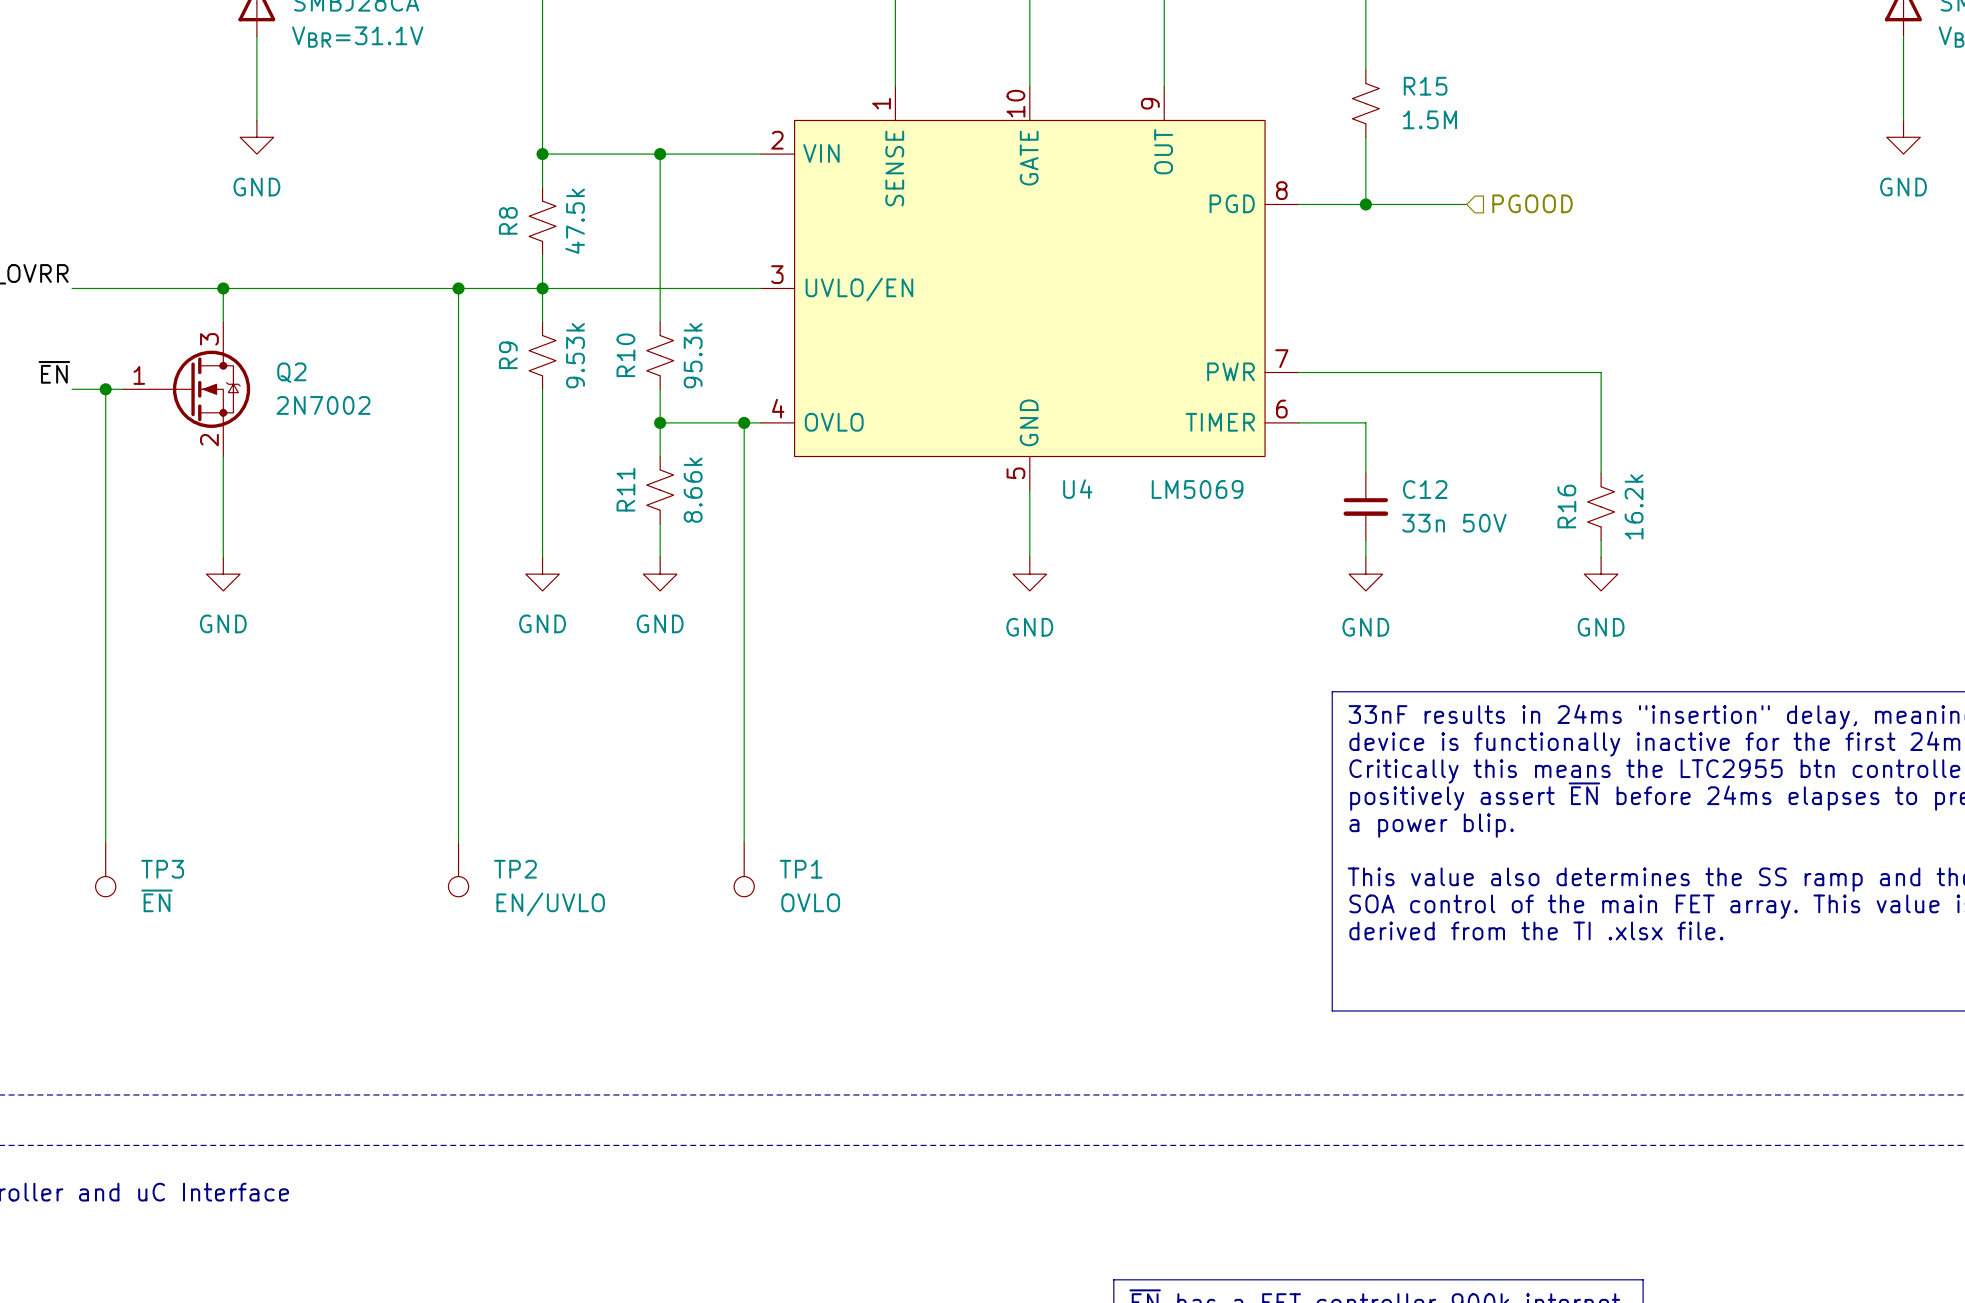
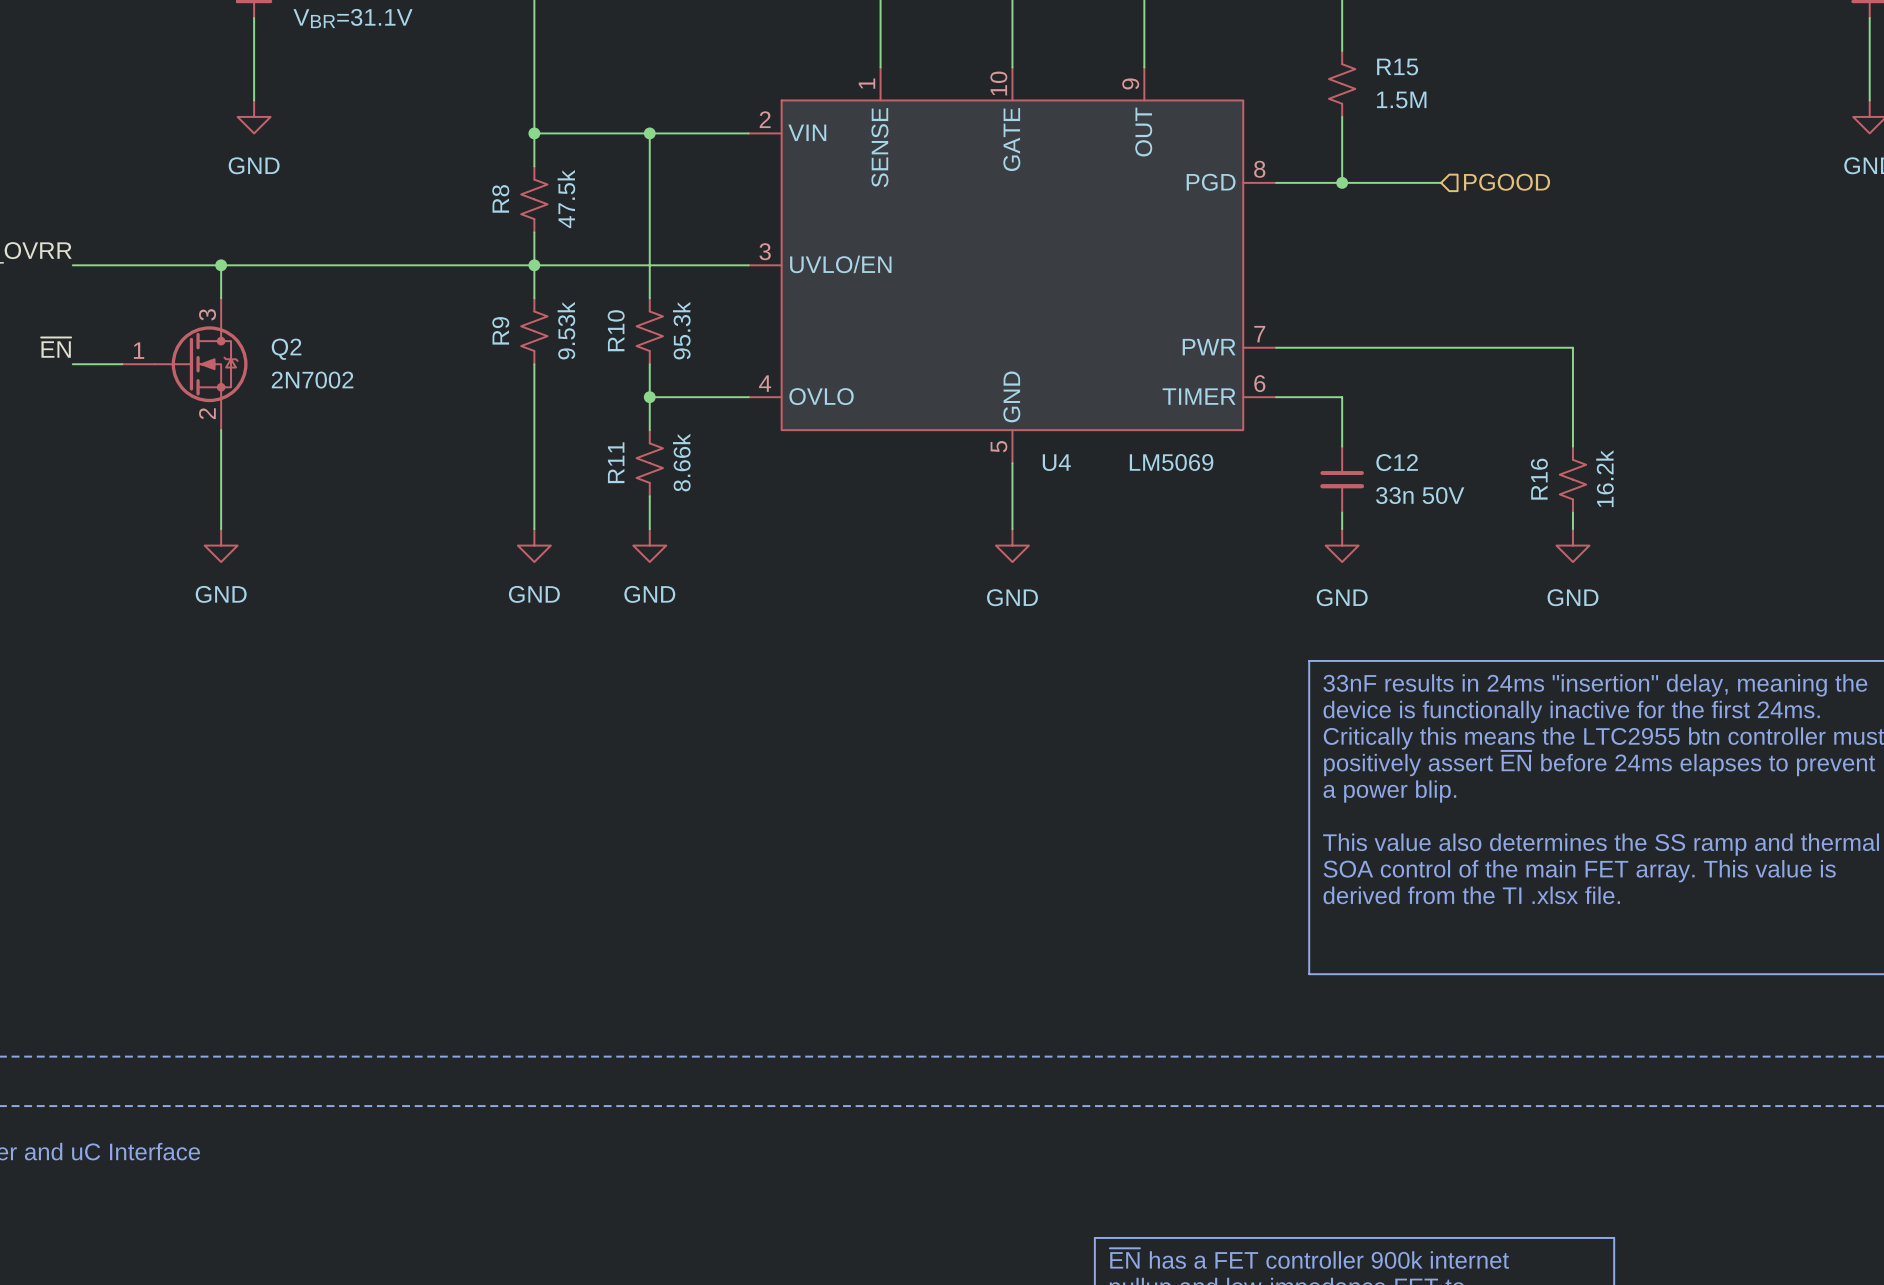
wire: (458, 288) (458, 842) -> none
junction: (458, 288) -> none
wire: (105, 389) (105, 842) -> none
junction: (105, 389) -> none
wire: (744, 422) (744, 842) -> none
junction: (744, 422) -> none
TP3: ~{EN} (105, 869) -> none
TP2: EN/UVLO (458, 869) -> none
TP1: OVLO (744, 869) -> none

